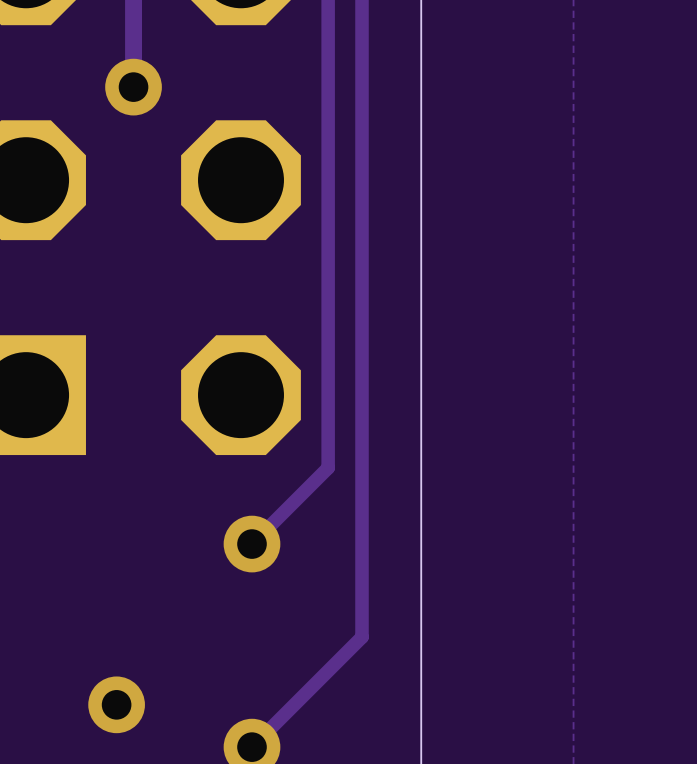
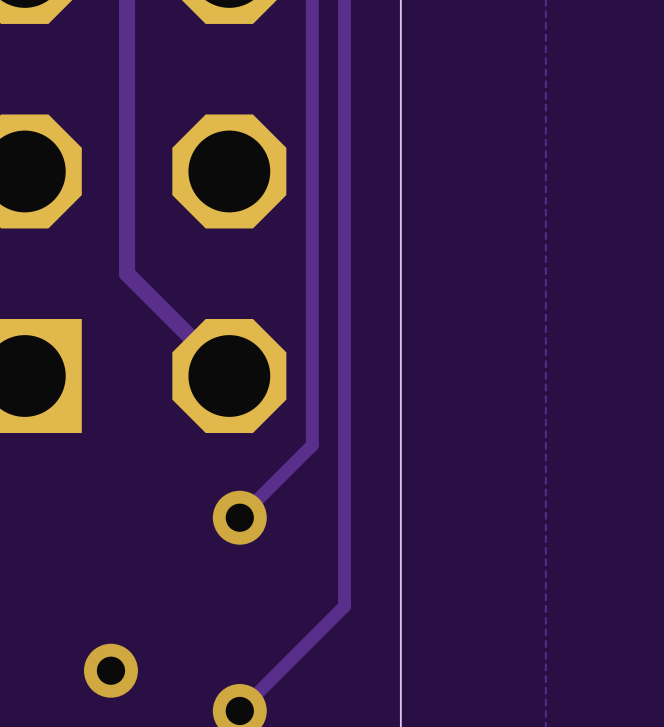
track: none -> (127, 82) (127, 273) (229, 376)
via: (133, 87) -> none

